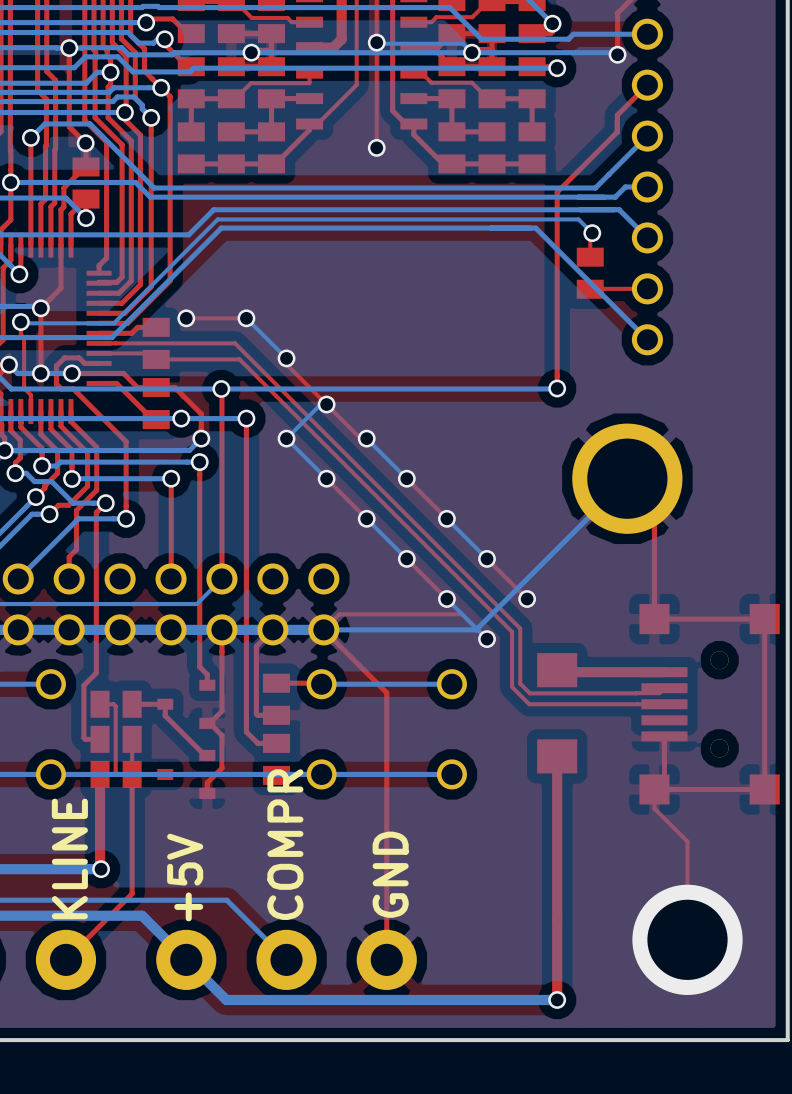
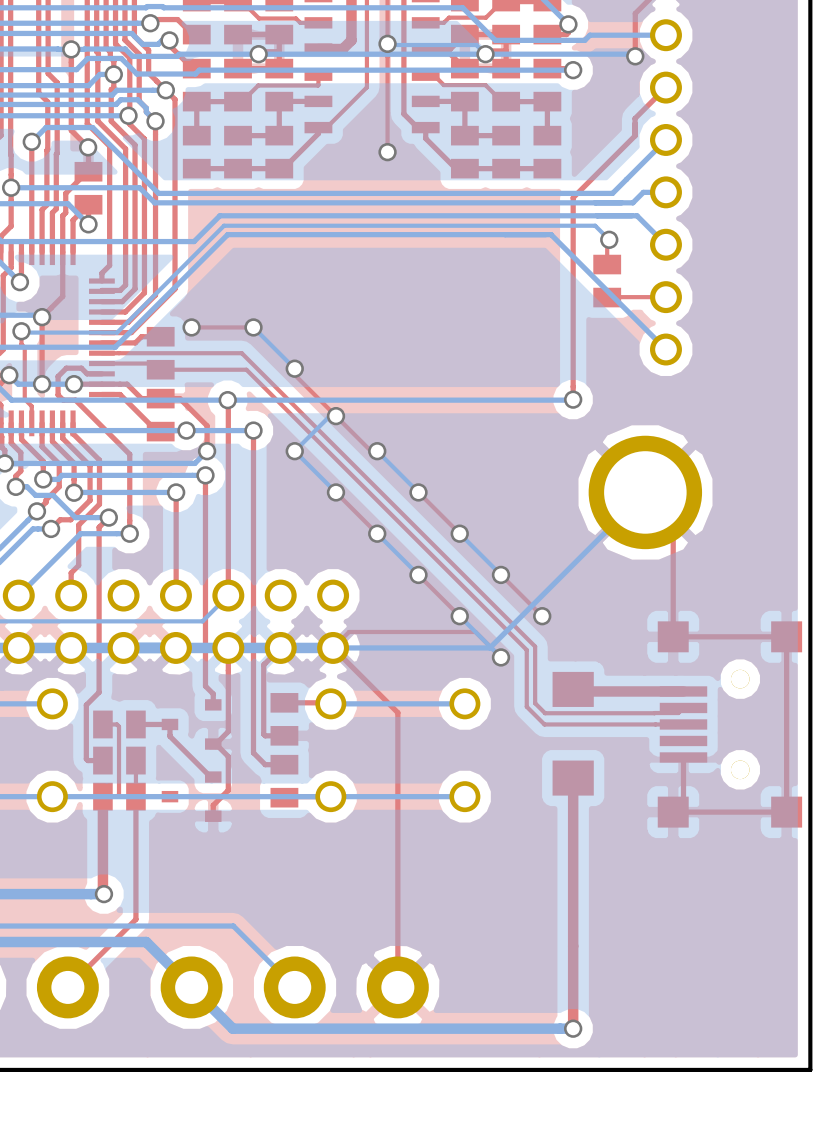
top track: (654, 789) (654, 808) (687, 841) (687, 939) -> none
text: COMPR (285, 844) -> none
text: KLINE (69, 858) -> none
text: GND (390, 874) -> none
text: +5V (185, 877) -> none
via: (687, 939) -> none

